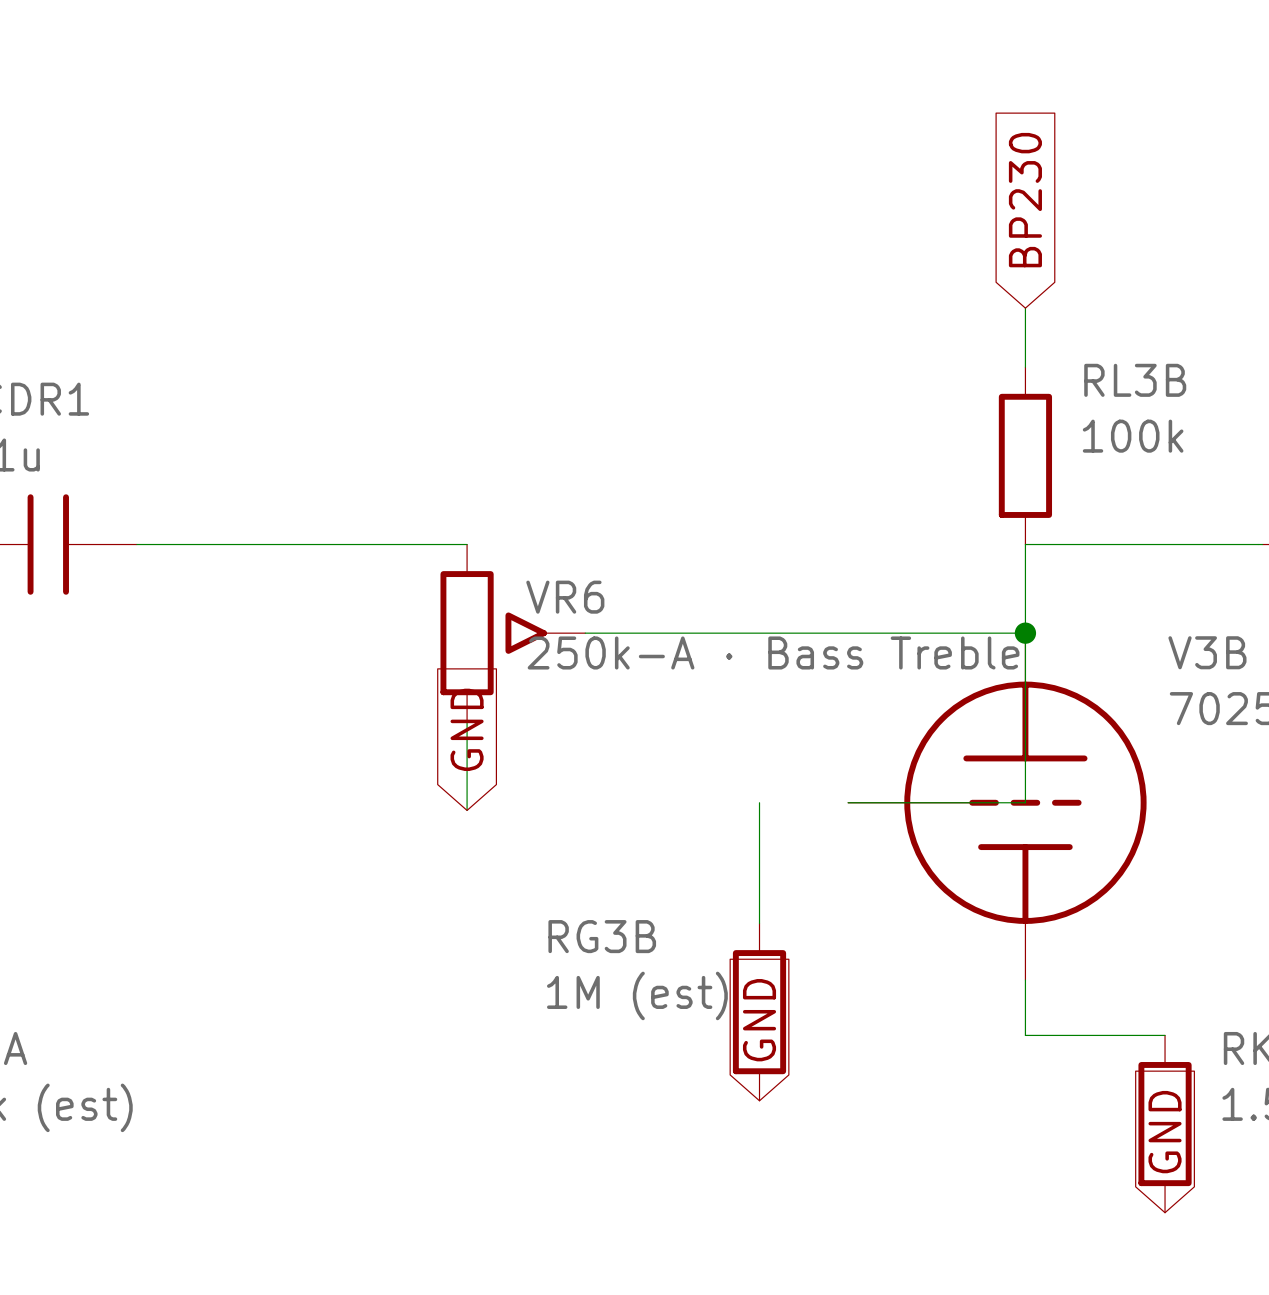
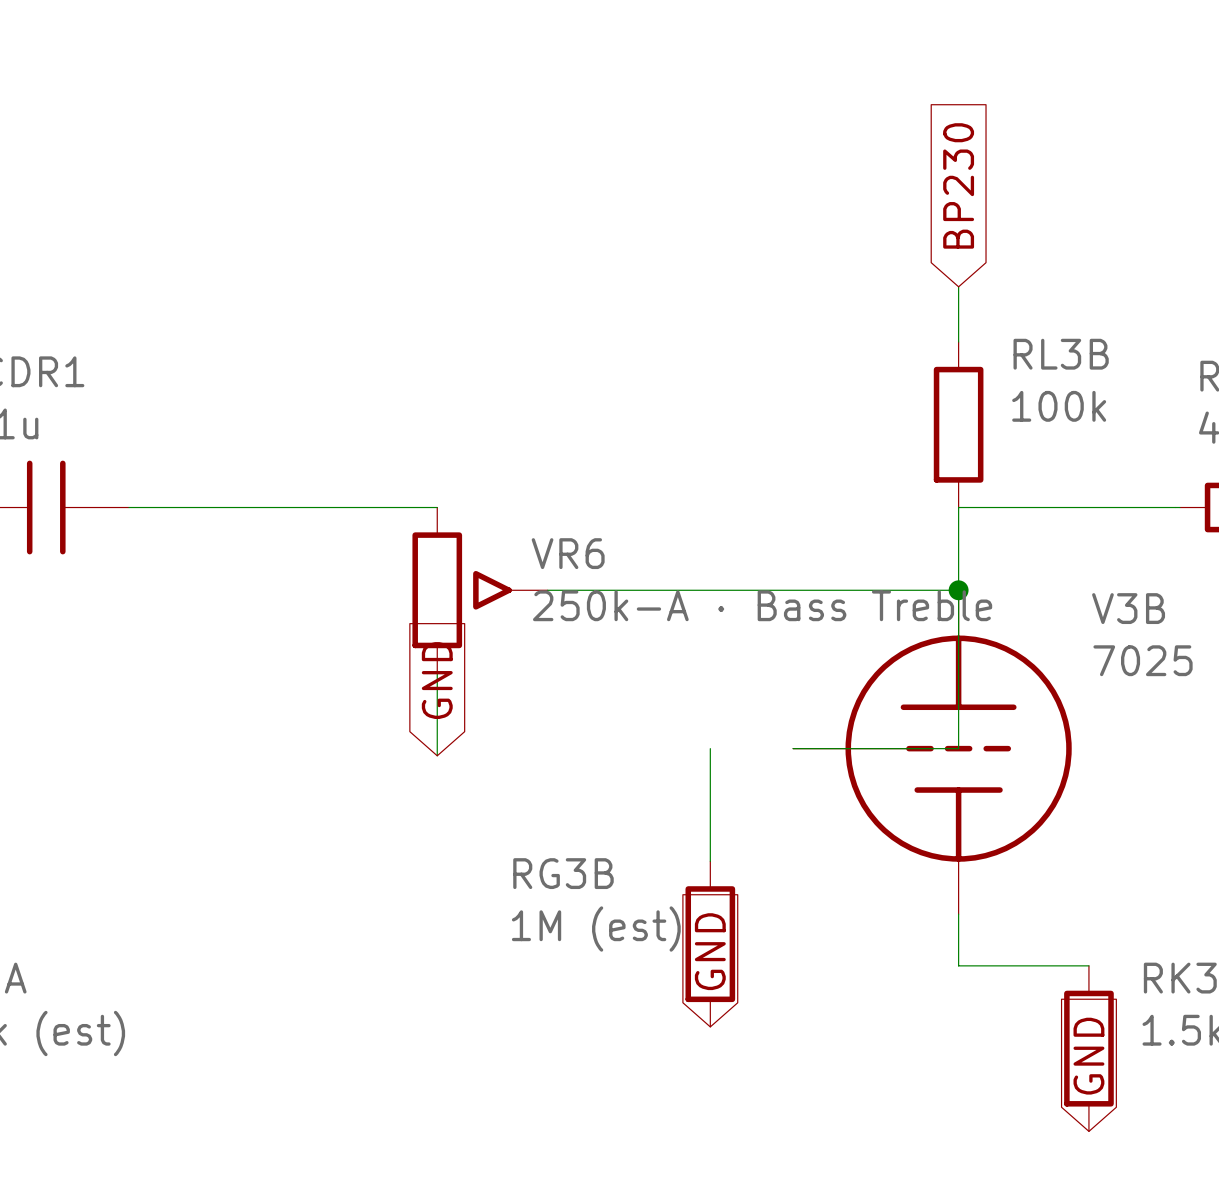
VR6 name position: VR6 (565, 597) -> VR6 (568, 553)
VR6 value position: 250k-A · Bass Treble (773, 652) -> 250k-A · Bass Treble (762, 605)

